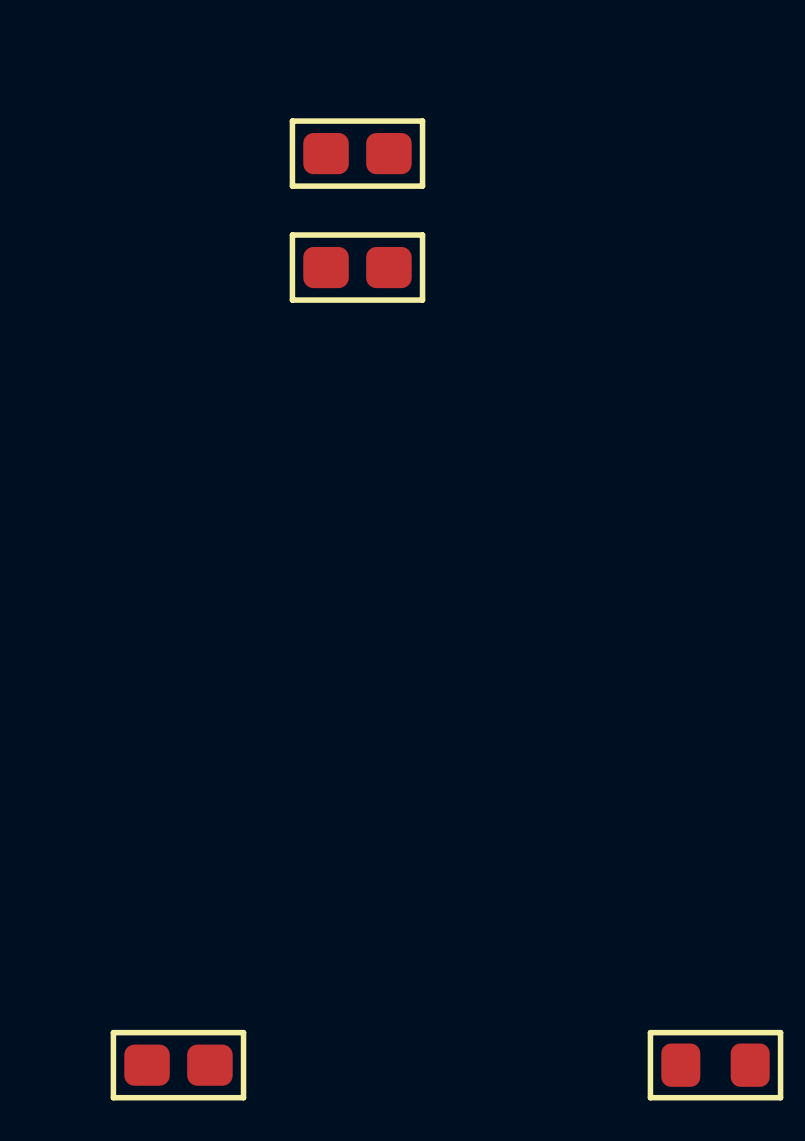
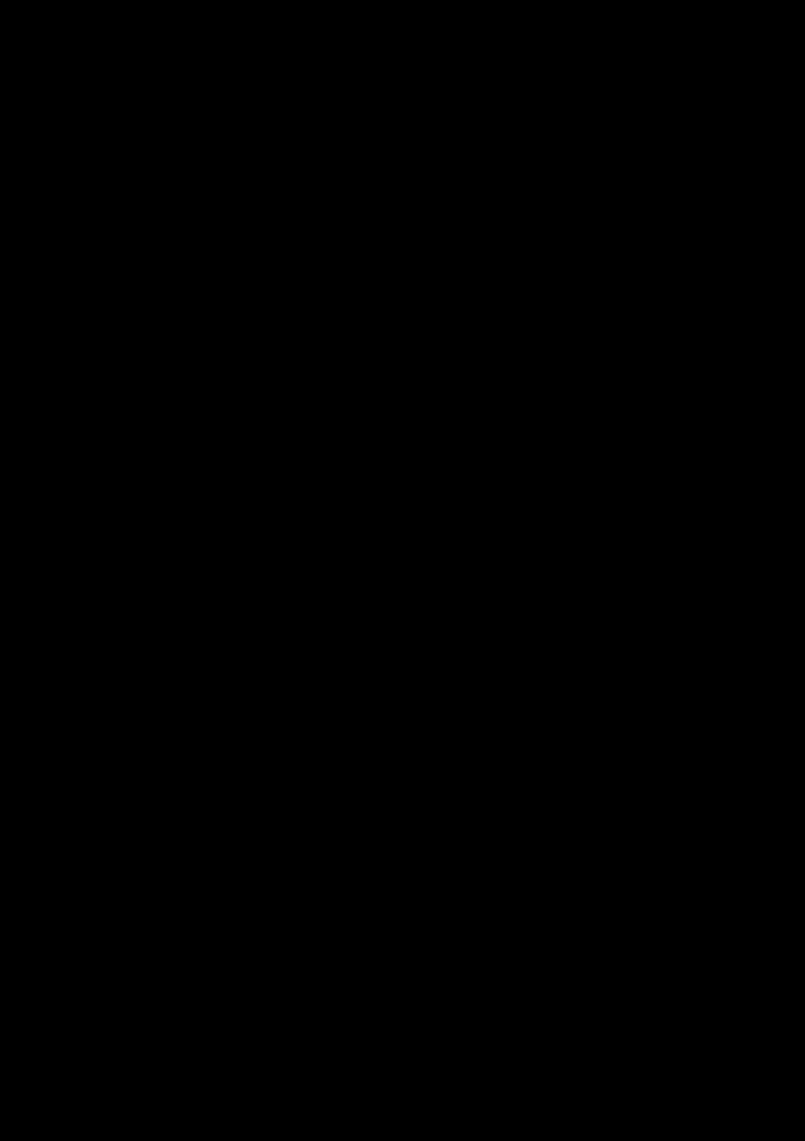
part: (357, 153) -> none
part: (357, 267) -> none
part: (178, 1065) -> none
part: (715, 1065) -> none

